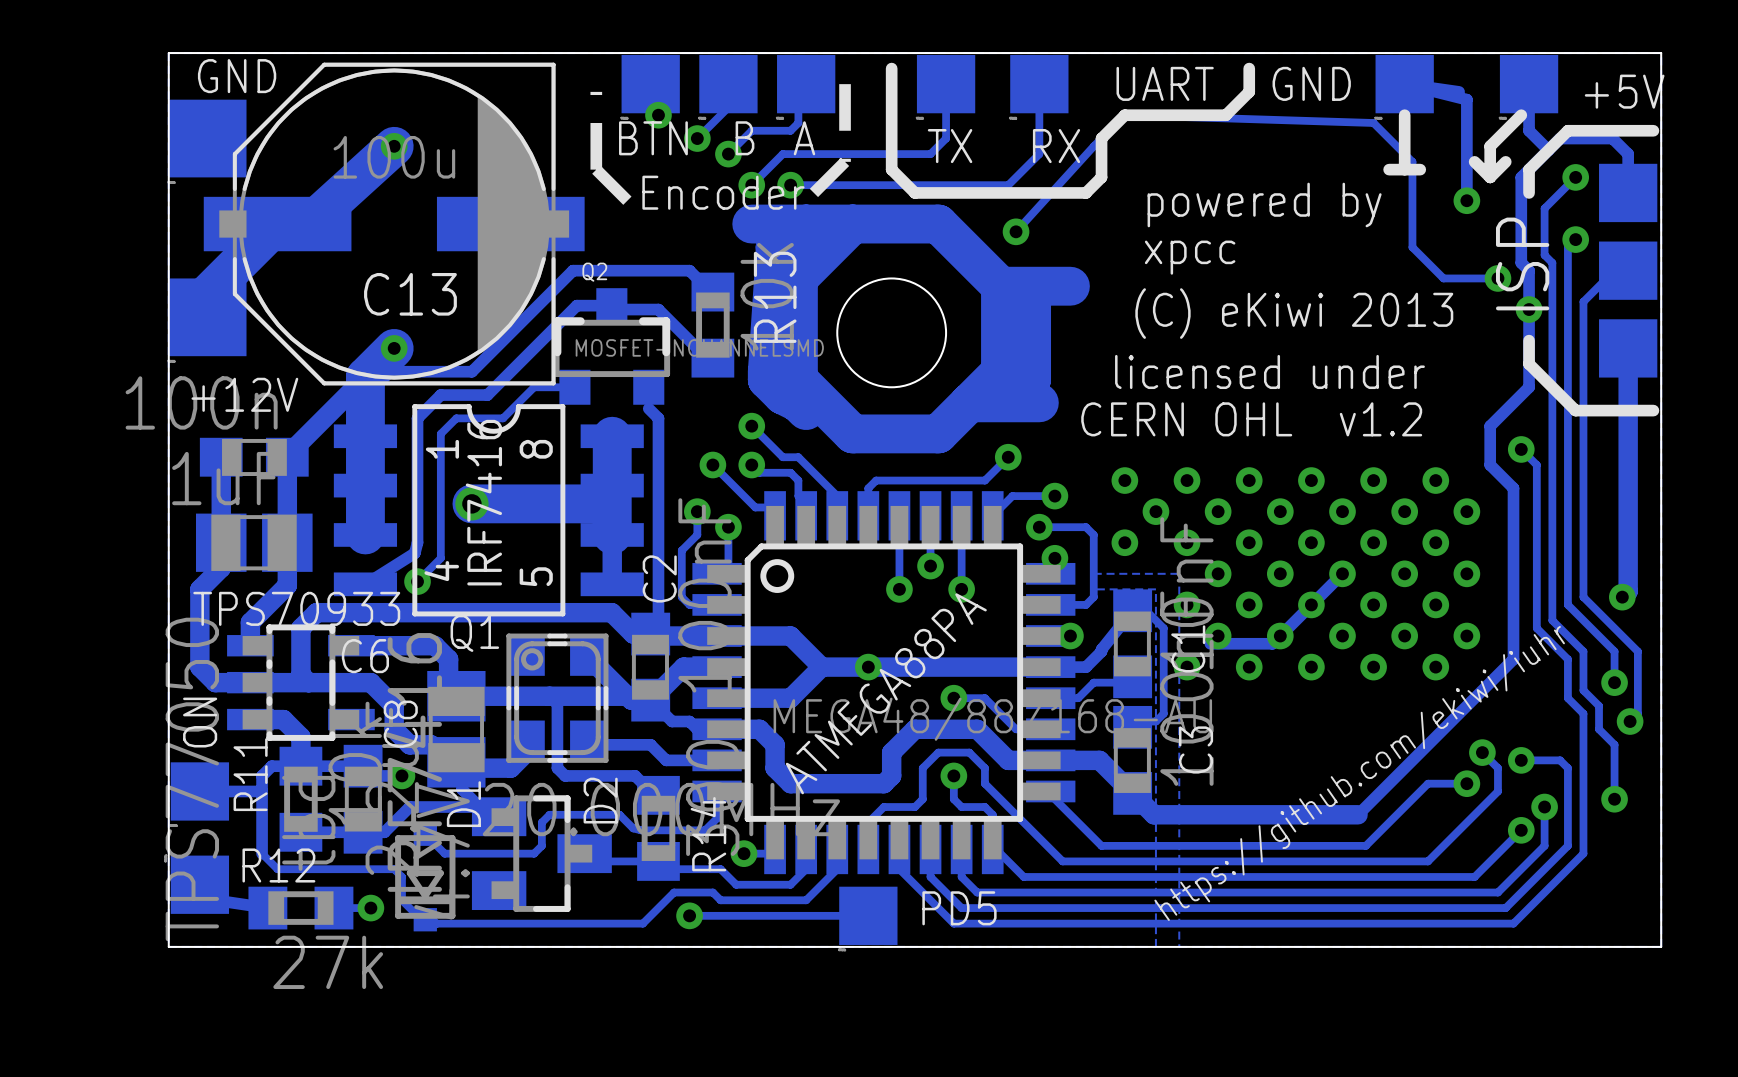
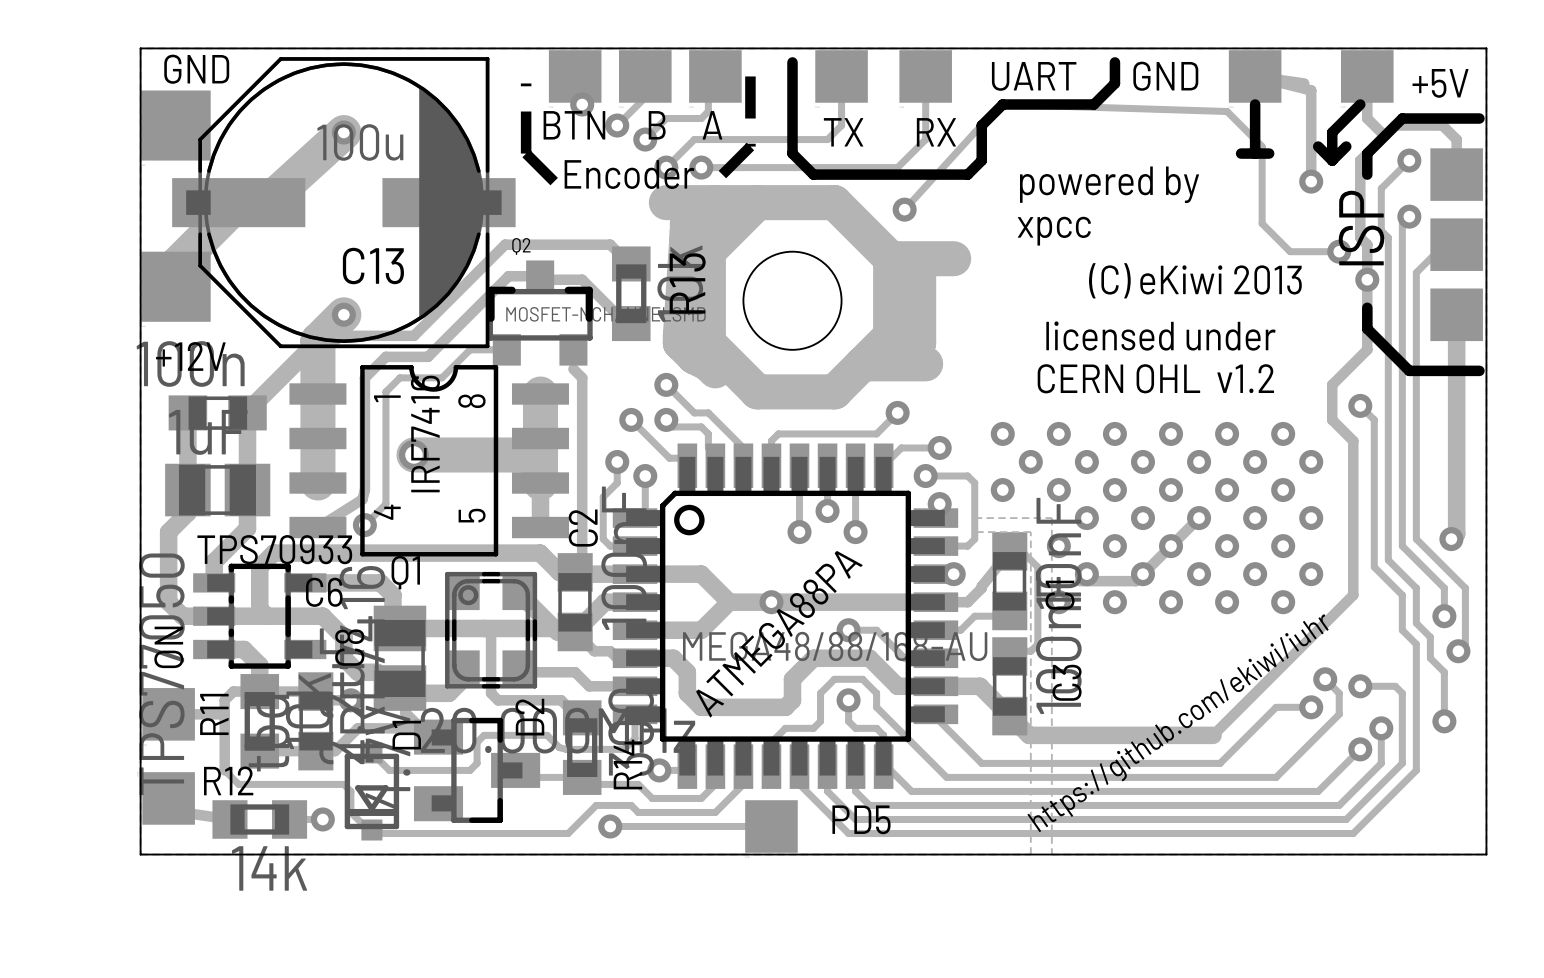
R12 value: 27k (328, 962) -> 14k (269, 868)

